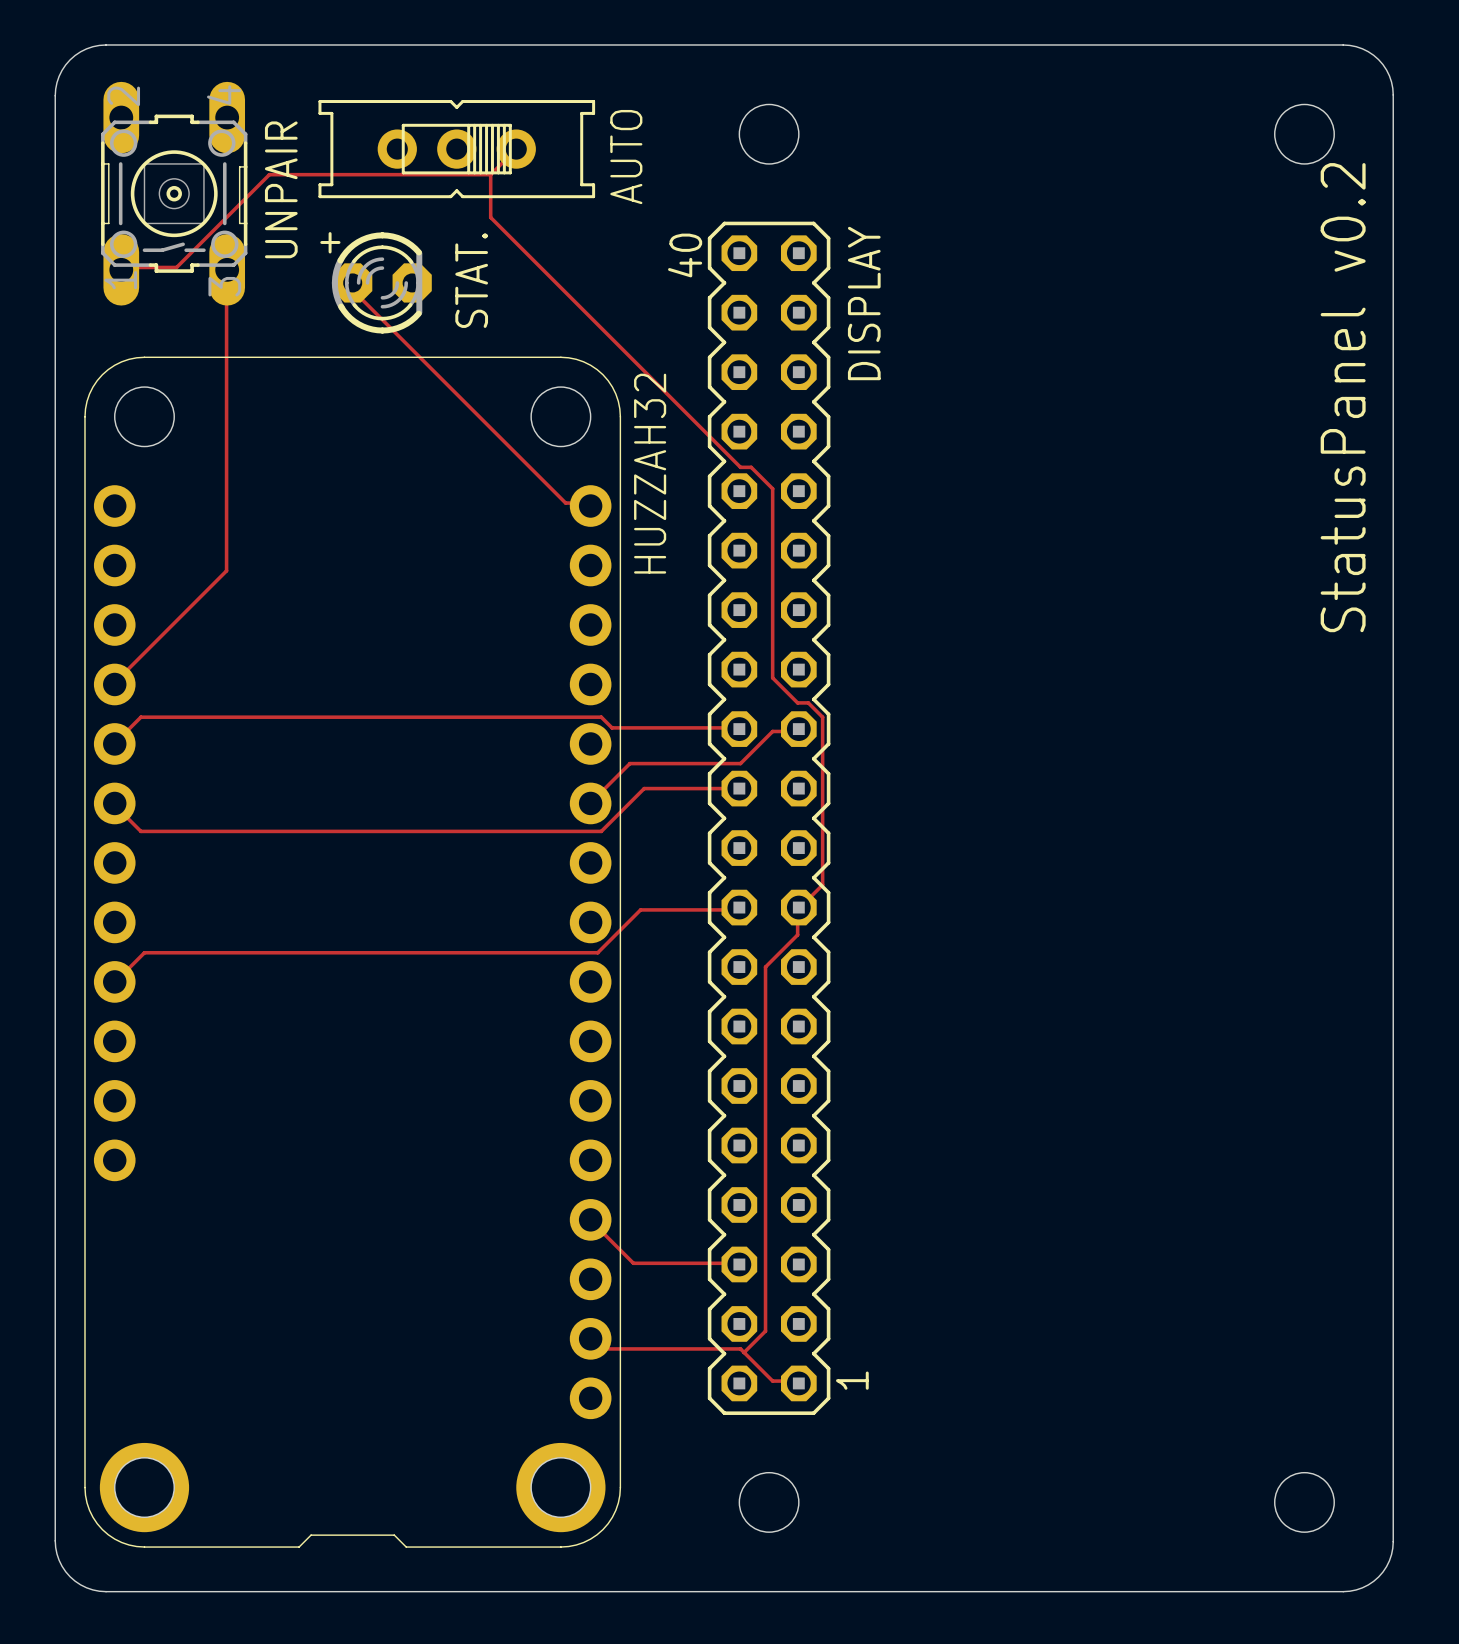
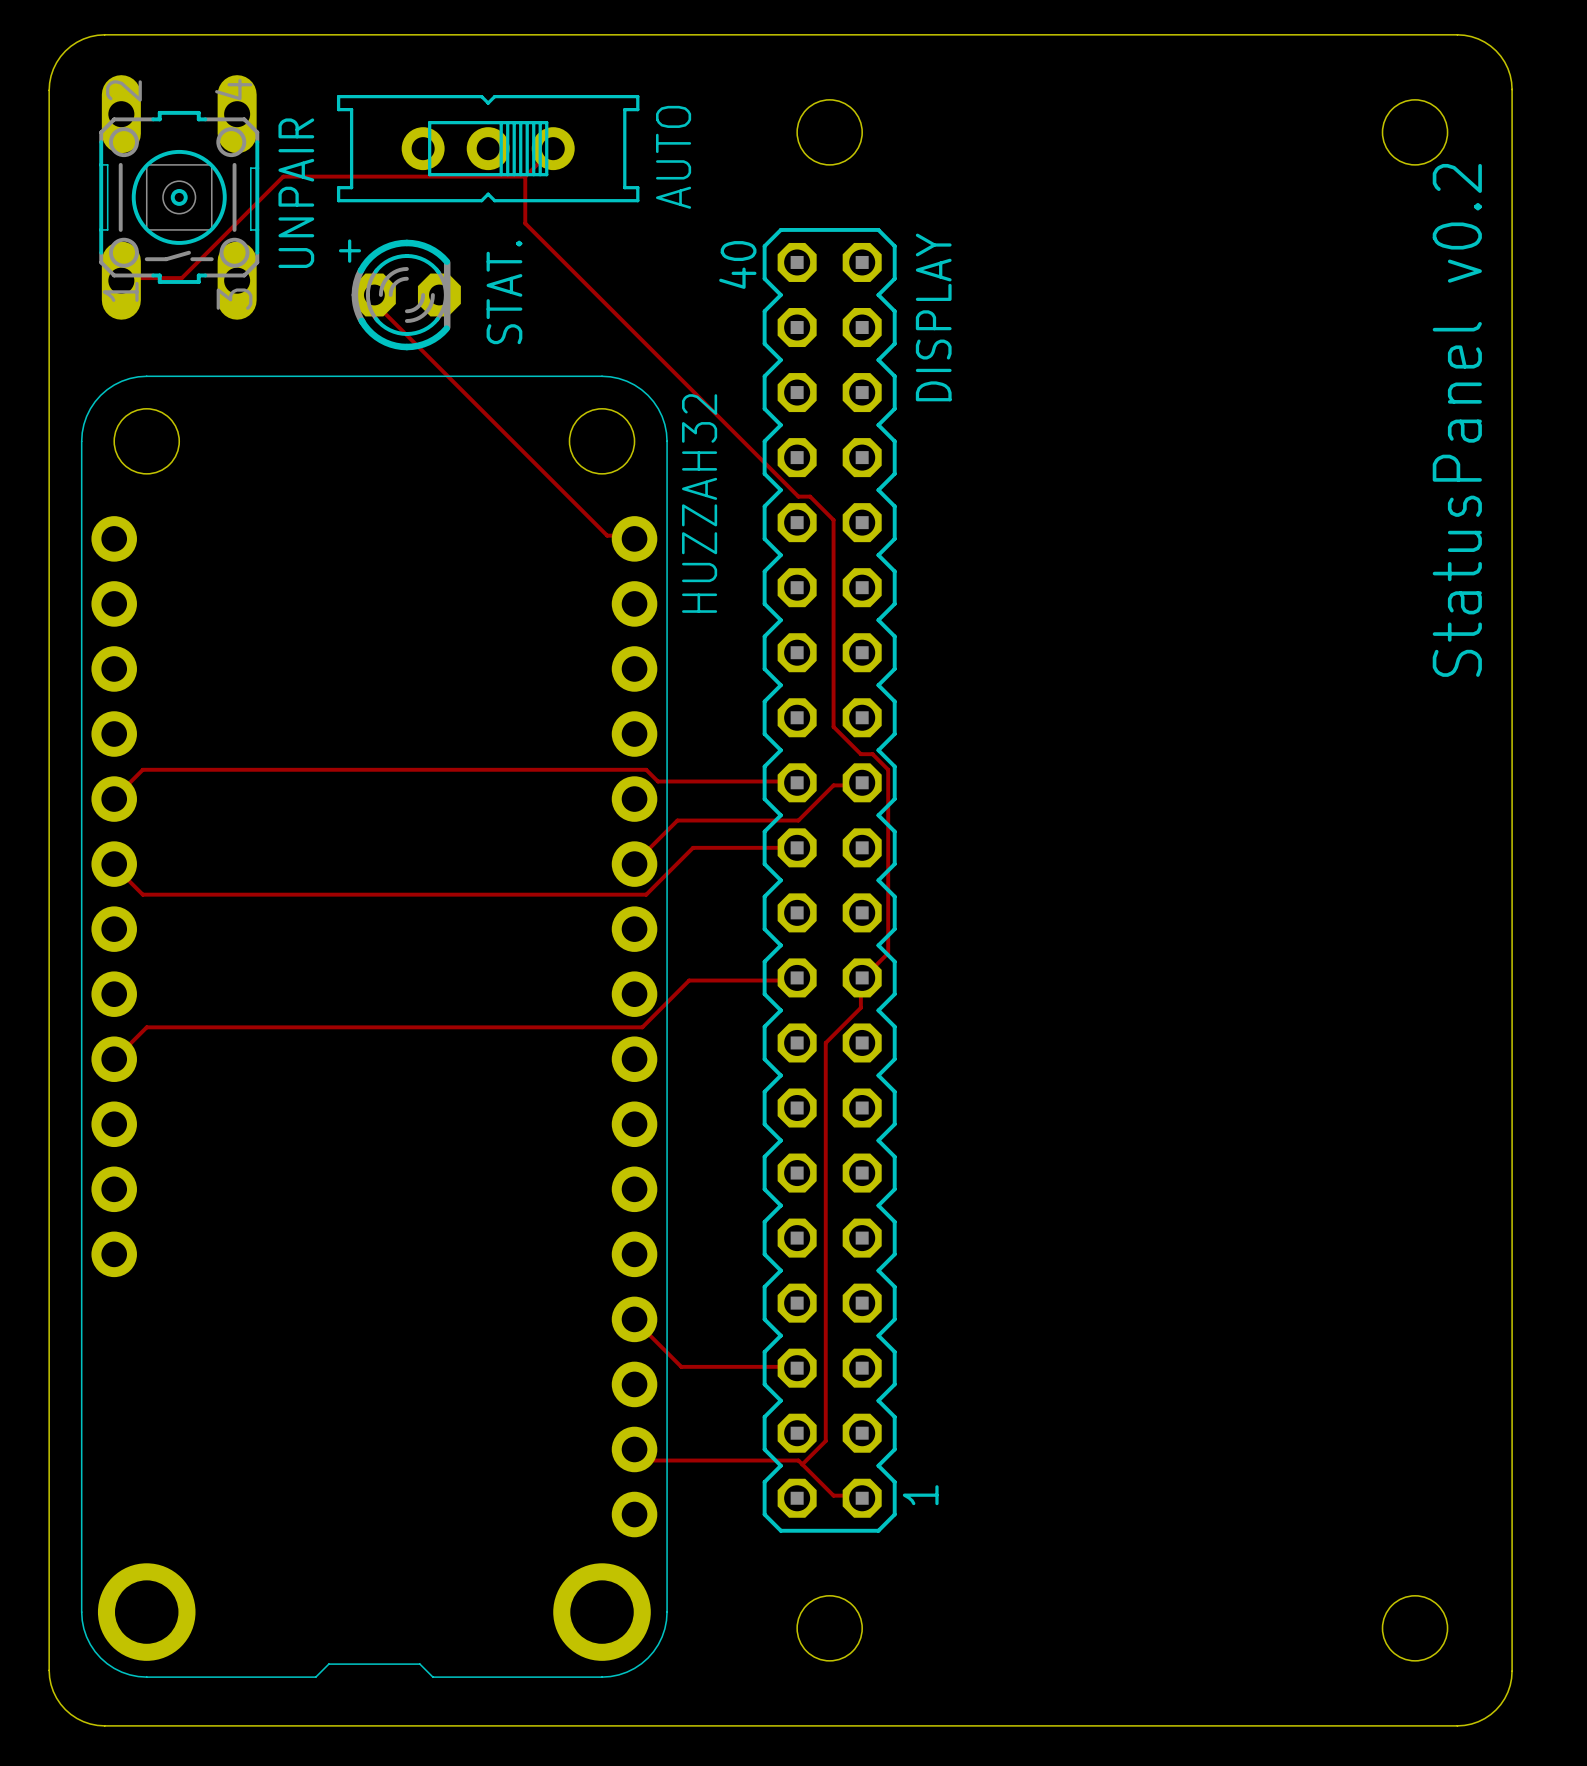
track: (227, 269) (226, 570) (114, 684) -> none

